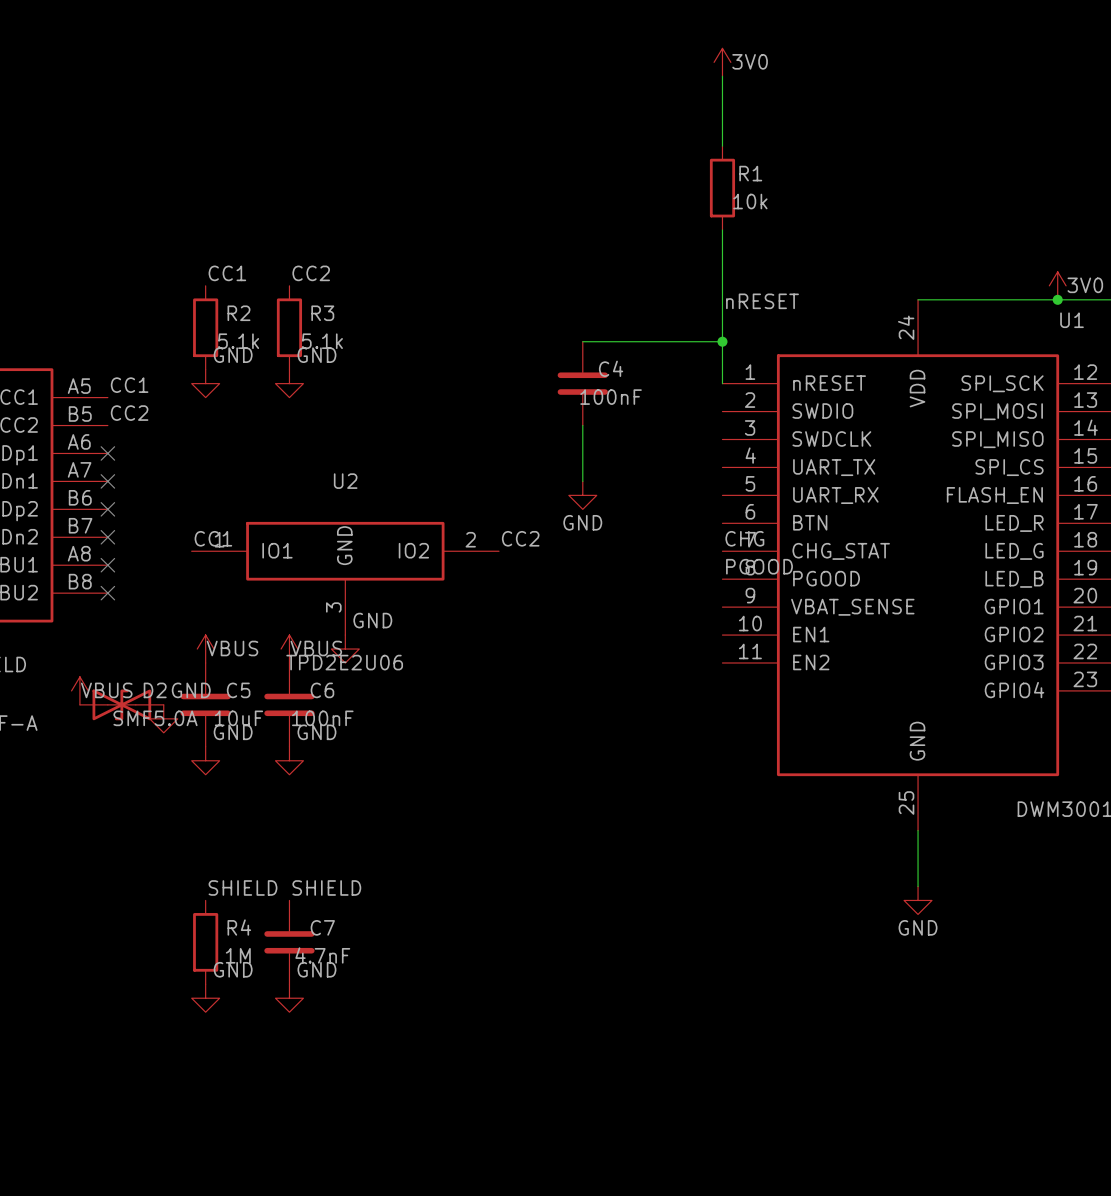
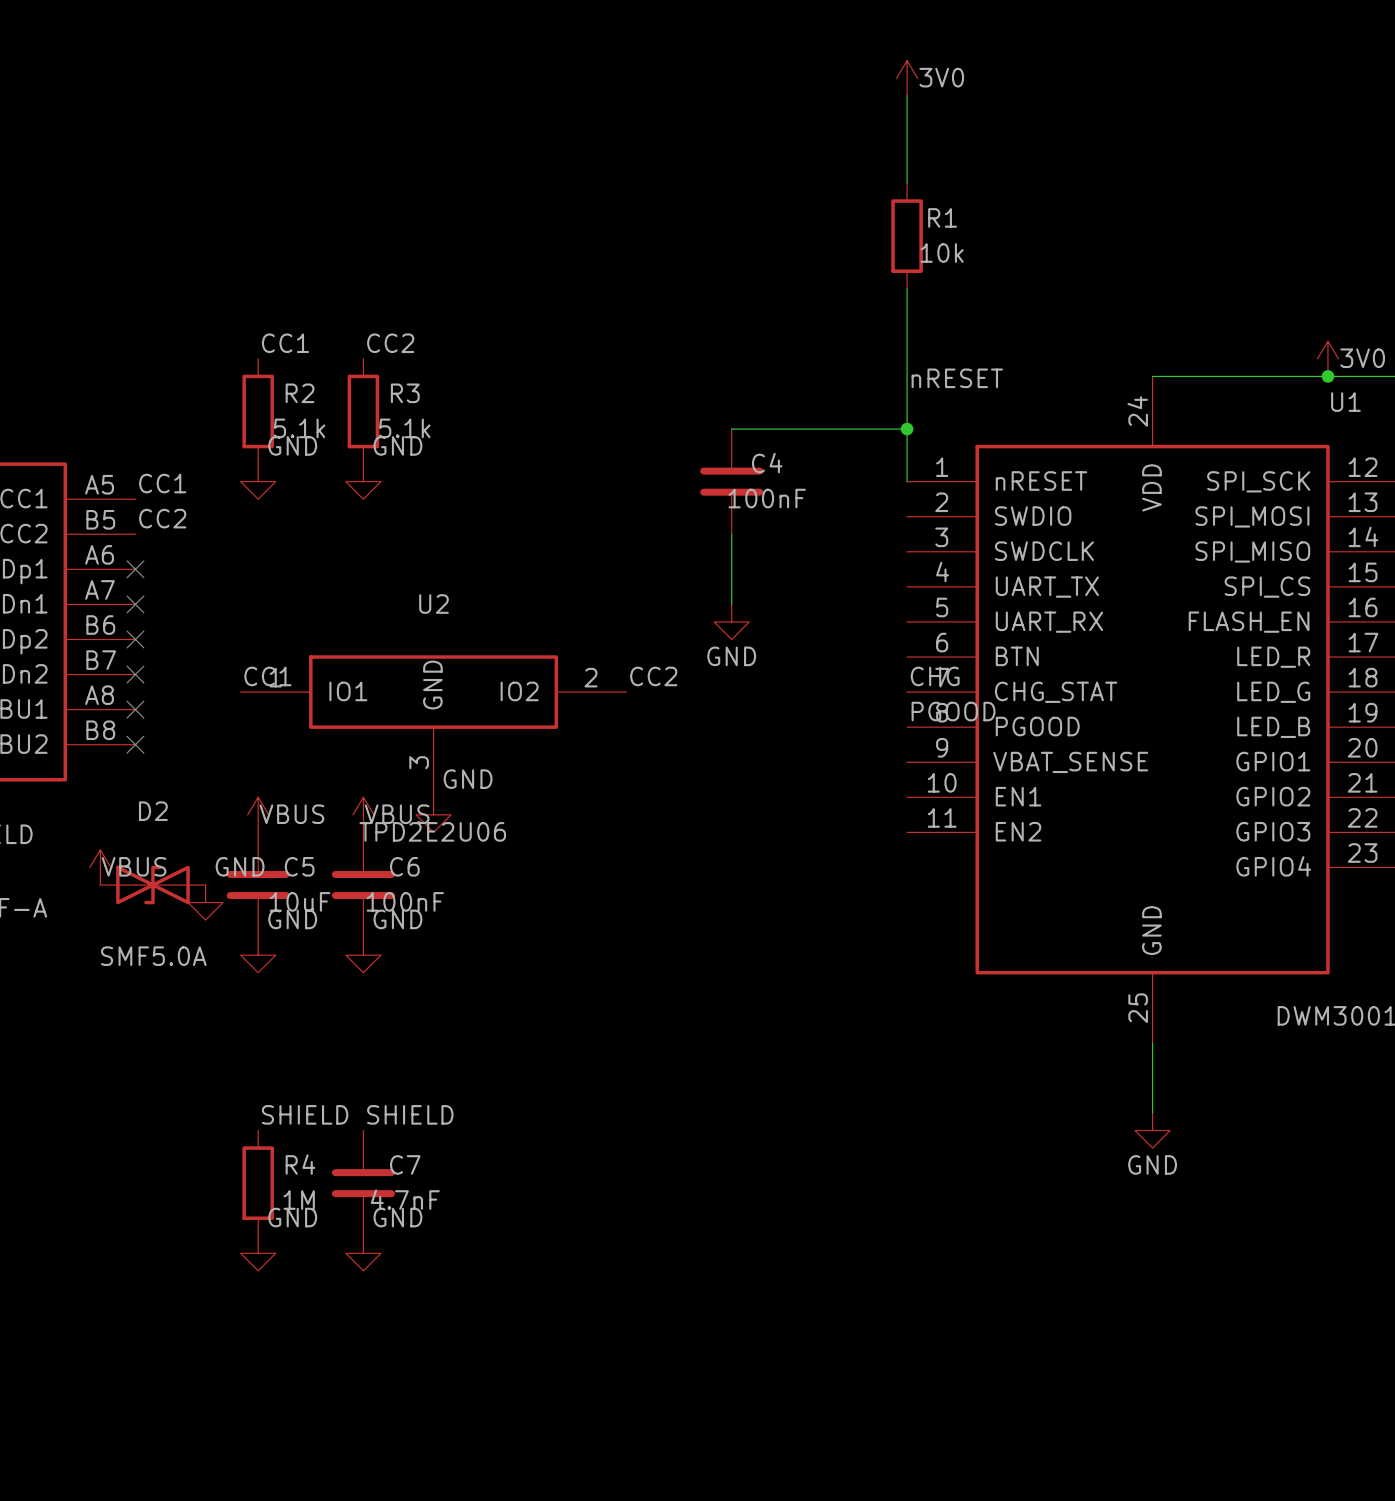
D2 name position: D2 (155, 690) -> D2 (153, 811)
D2 value position: SMF5.0A (155, 718) -> SMF5.0A (153, 956)

